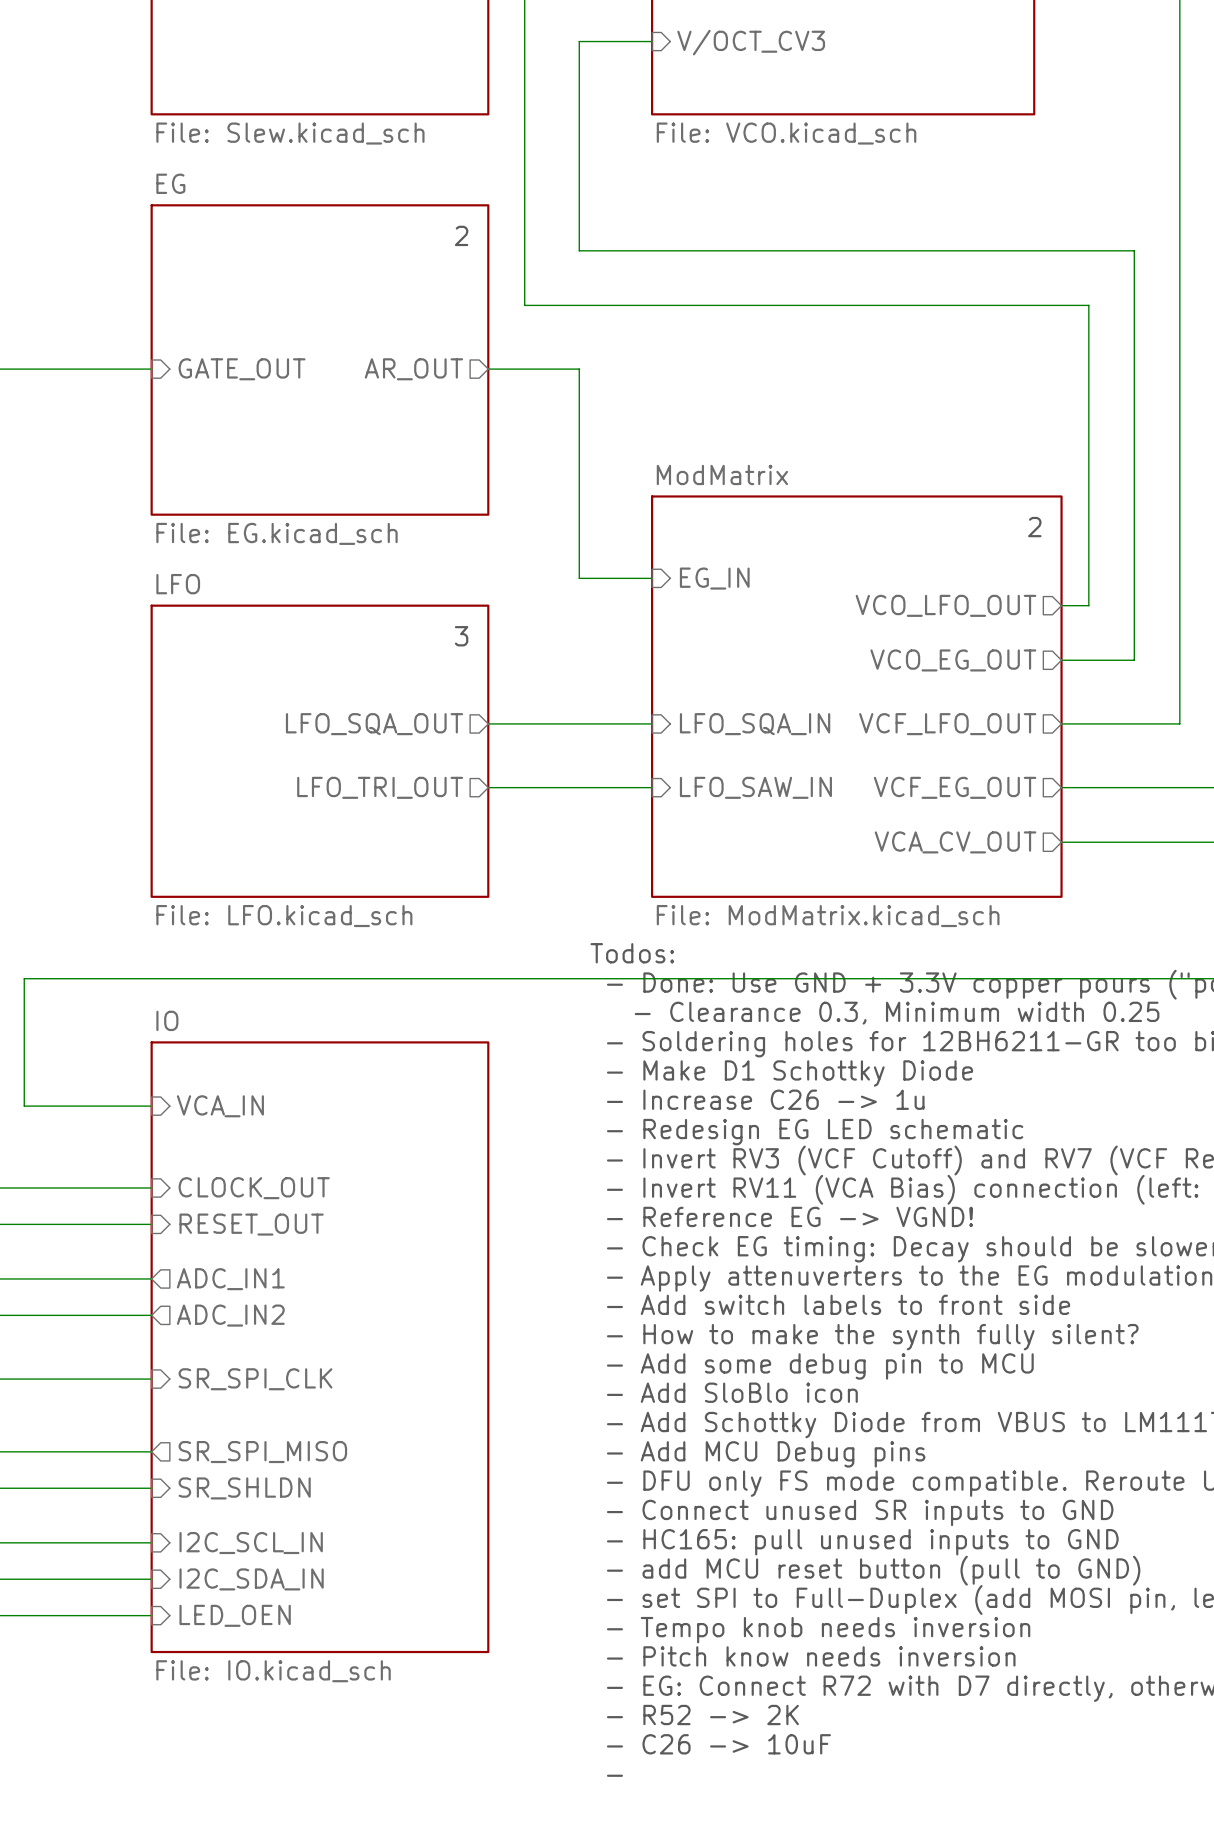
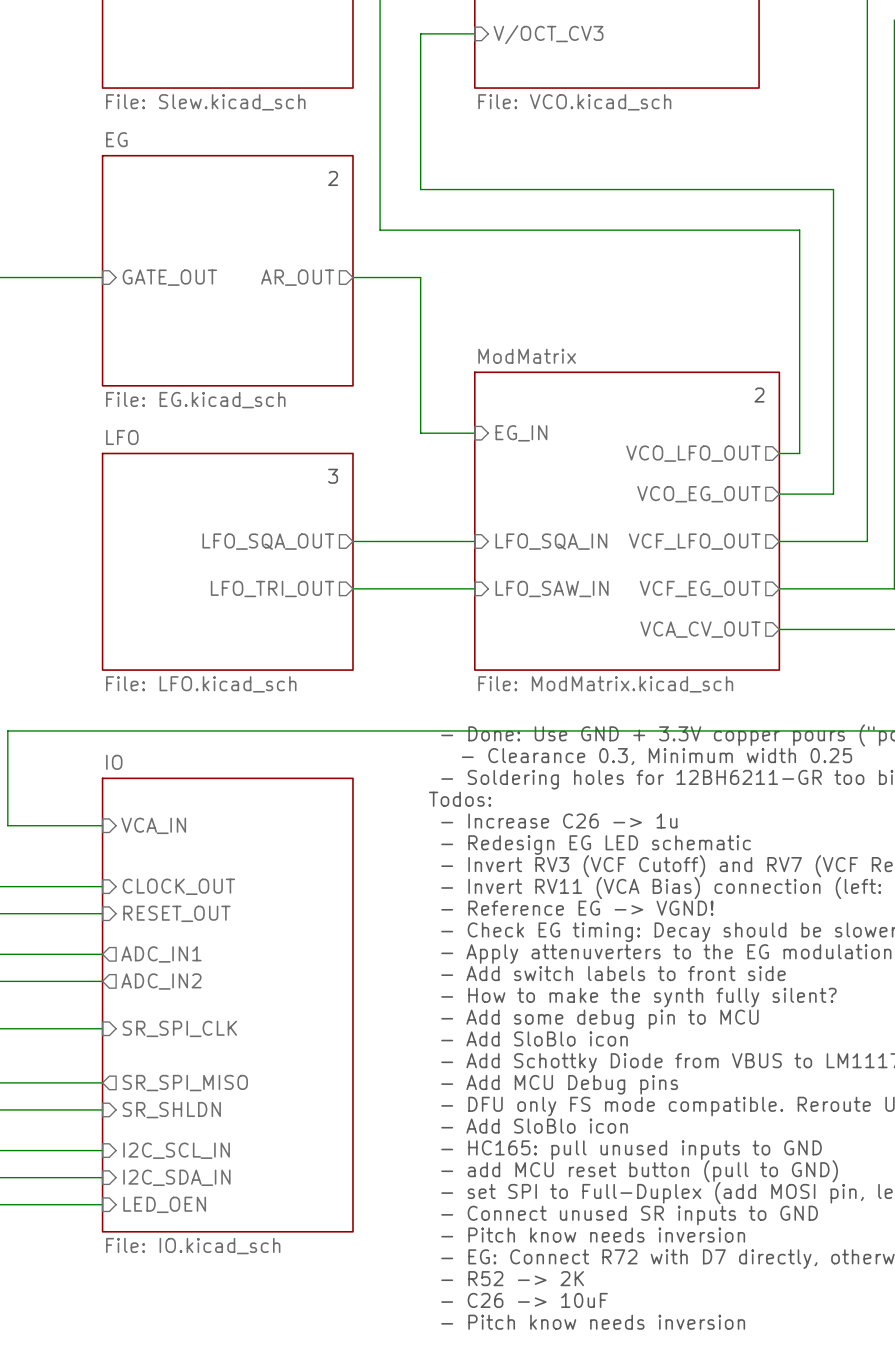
text: Todos: (632, 953) -> none
text: - Make D1 Schottky Diode (790, 1073) -> Todos: (460, 799)
text: - Connect unused SR inputs to GND (860, 1512) -> - Add SloBlo icon (534, 1126)
text: - Tempo knob needs inversion (818, 1630) -> - Connect unused SR inputs to GND (629, 1215)
text: - (614, 1775) -> - Pitch know needs inversion (593, 1322)

